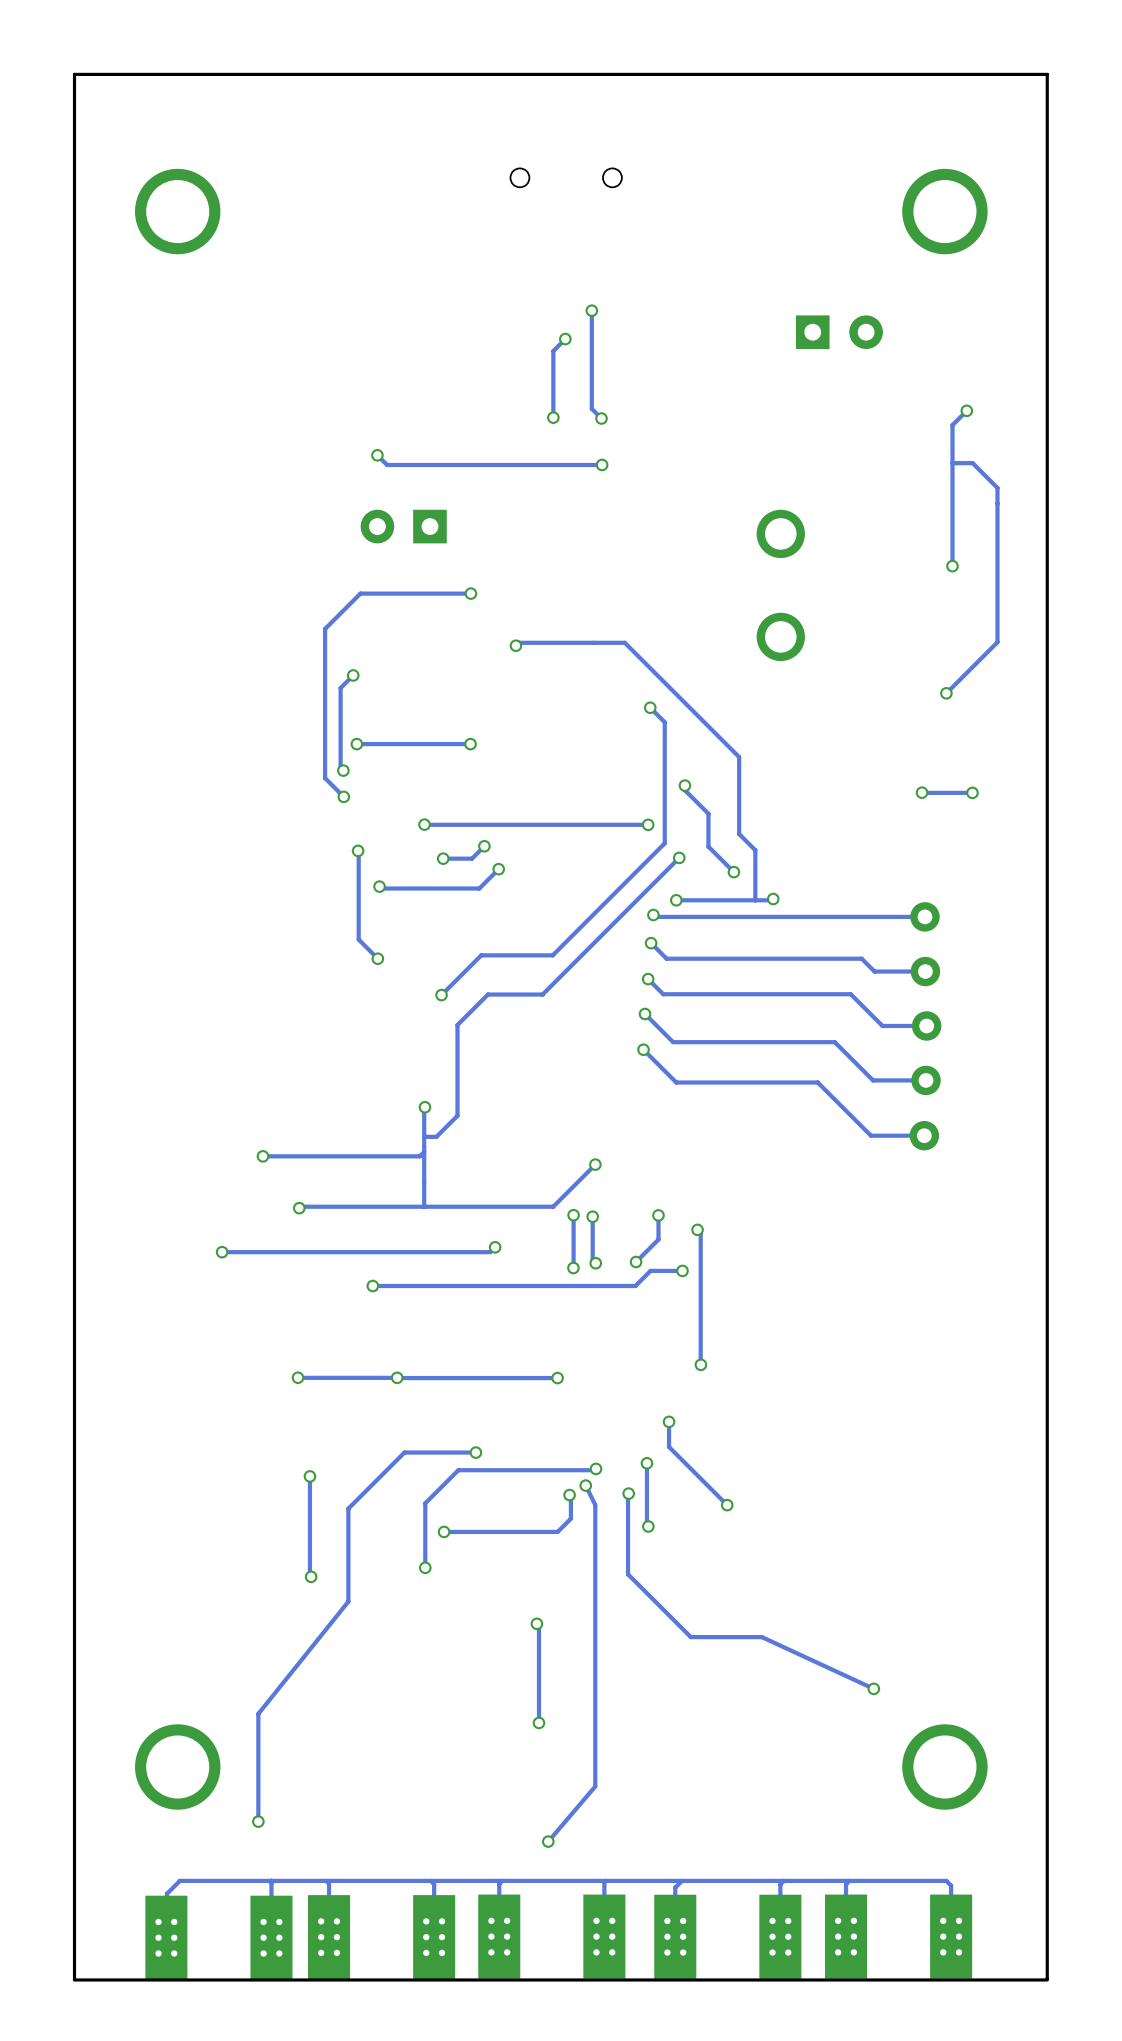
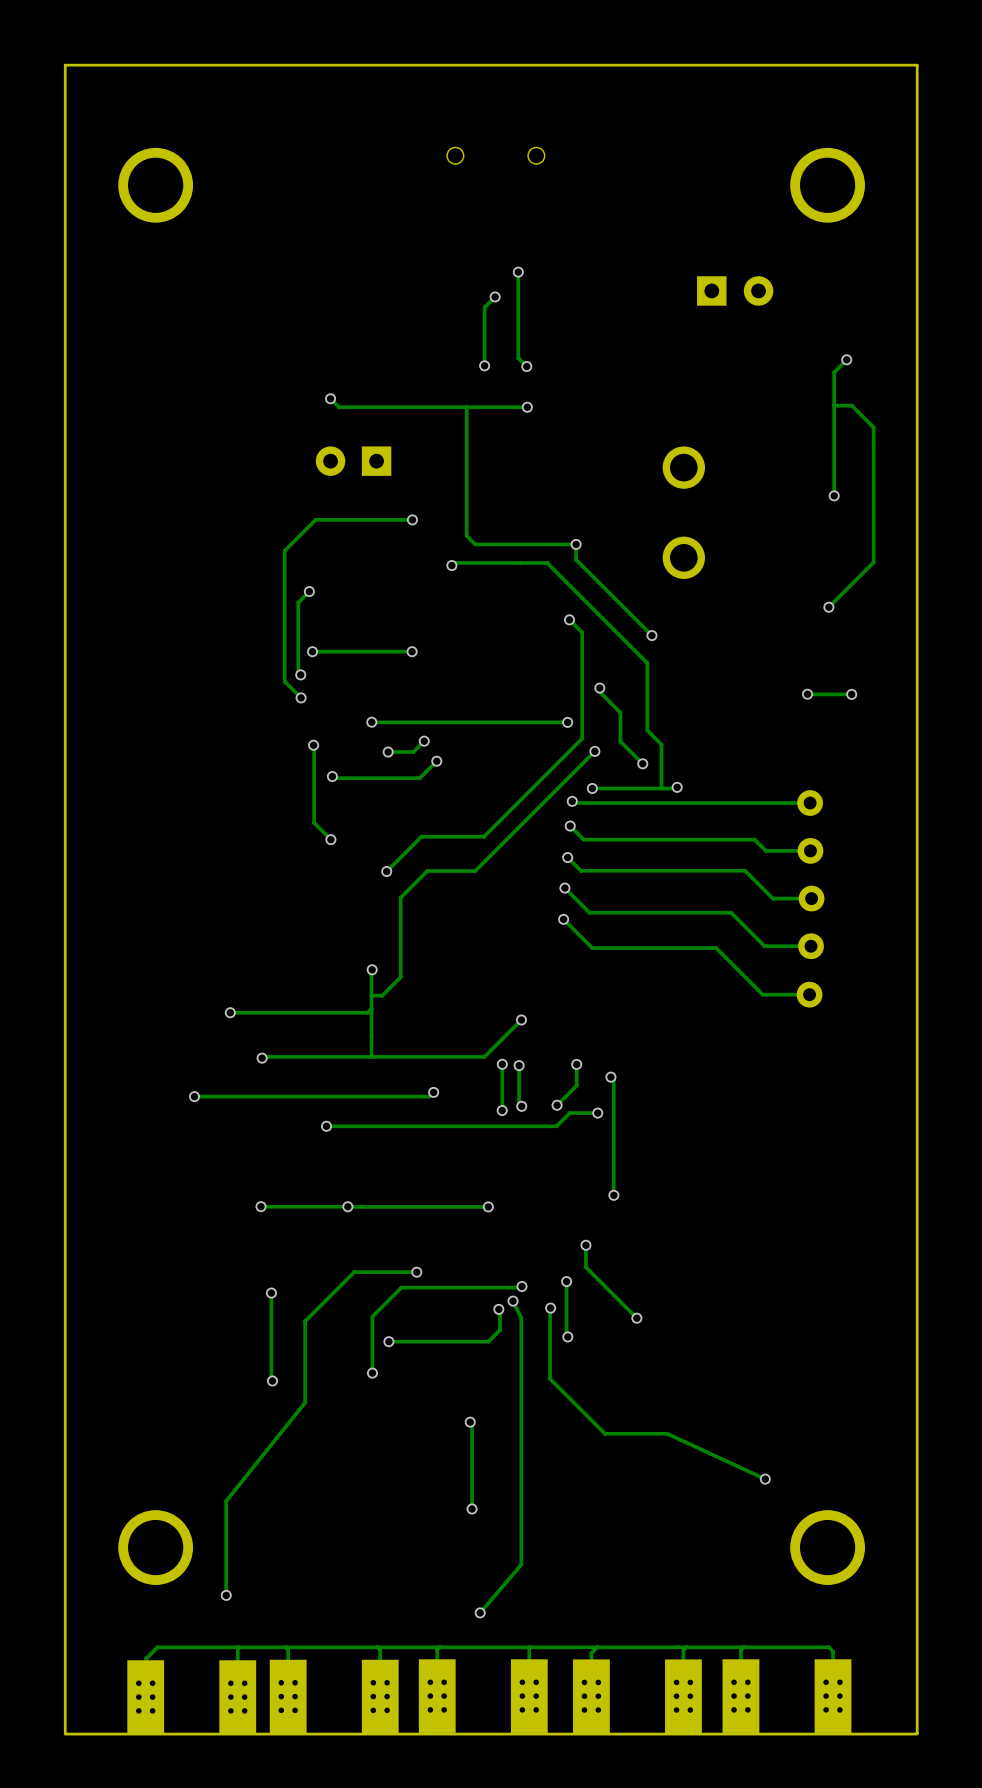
track: none -> (466, 407) (466, 535) (475, 544) (576, 544) (576, 559) (651, 635)
via: none -> (576, 544)
via: none -> (651, 635)

